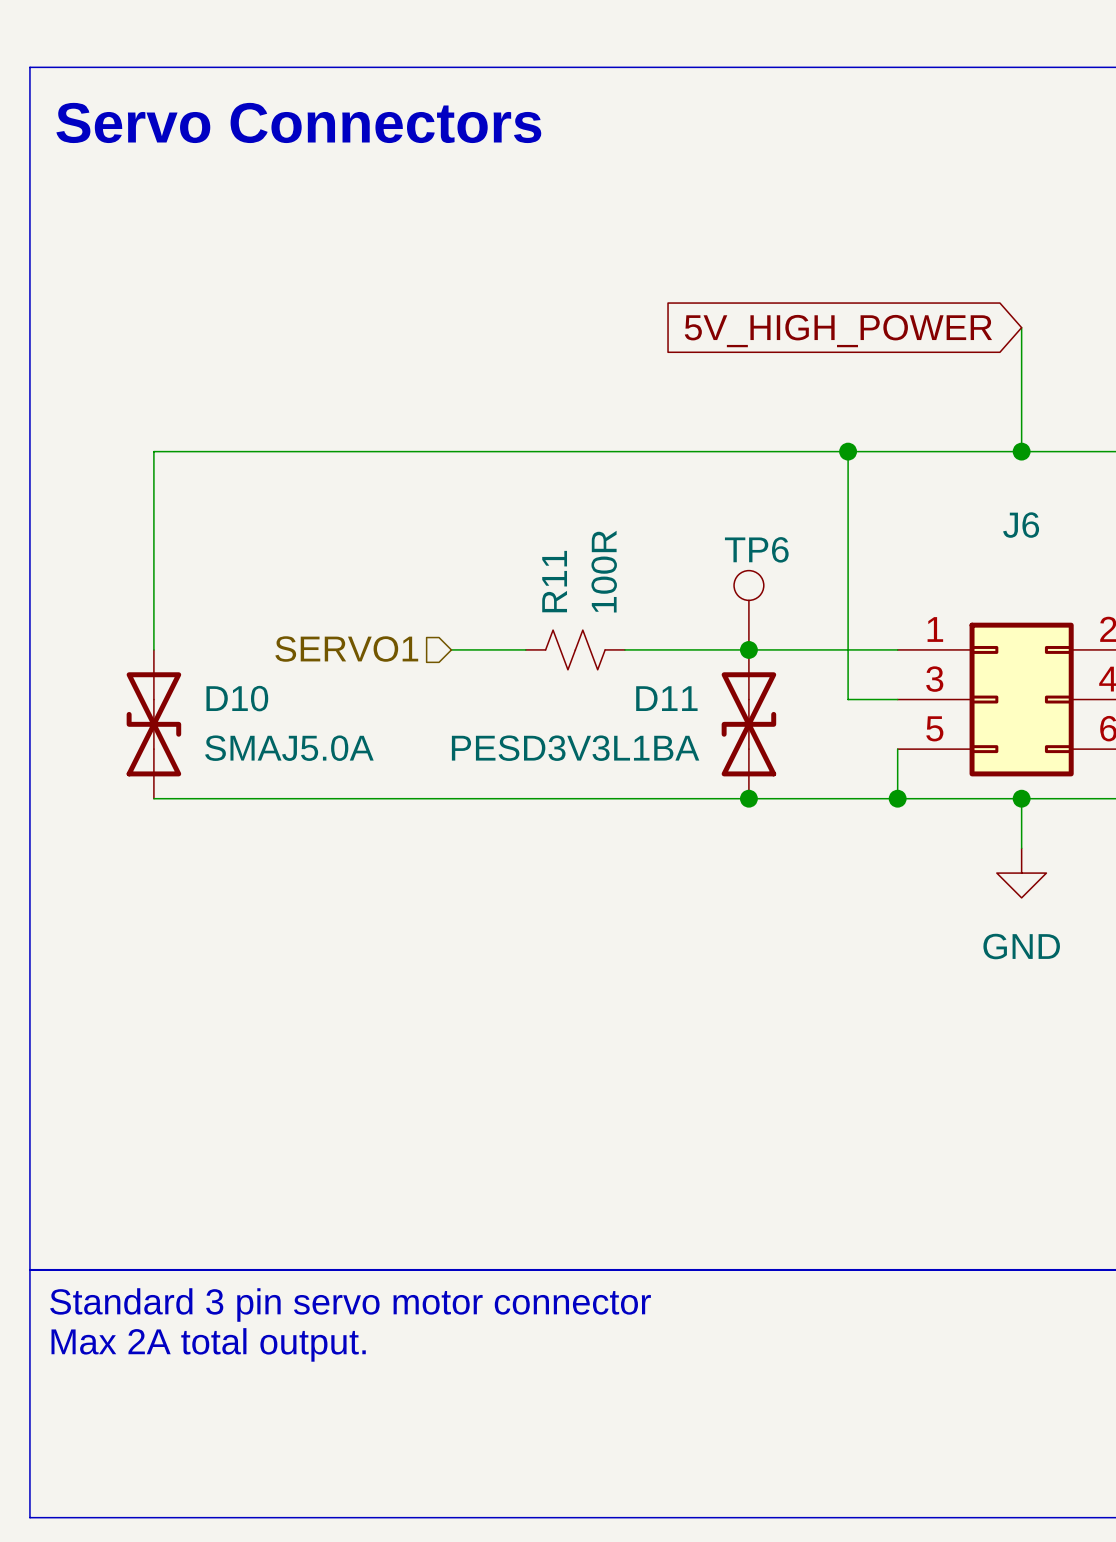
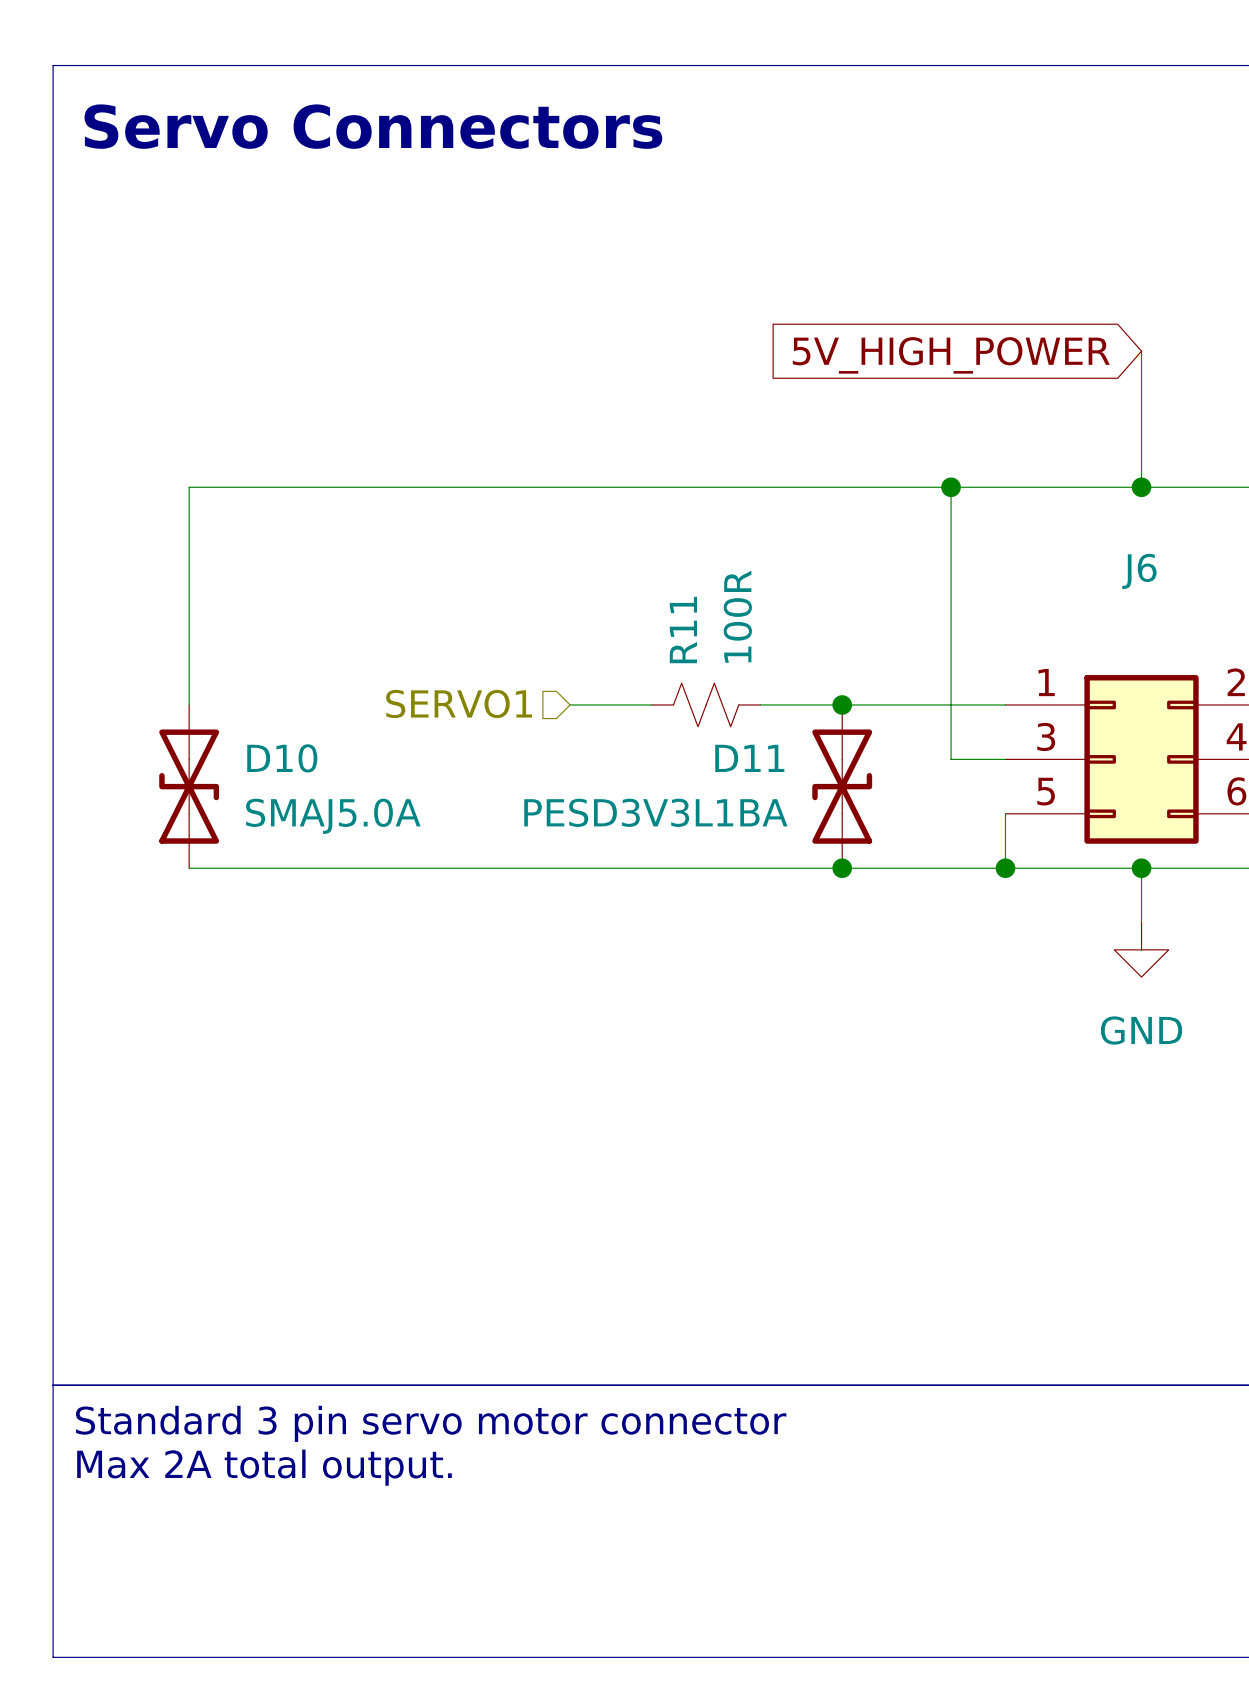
TP6: (748, 610) -> none
hierarchical label position: SERVO1 (346, 649) -> SERVO1 (459, 703)
wire: (451, 649) (501, 649) -> (597, 704) (651, 704)
R11 position: (575, 649) -> (706, 704)
wire: (624, 649) (674, 649) -> none

